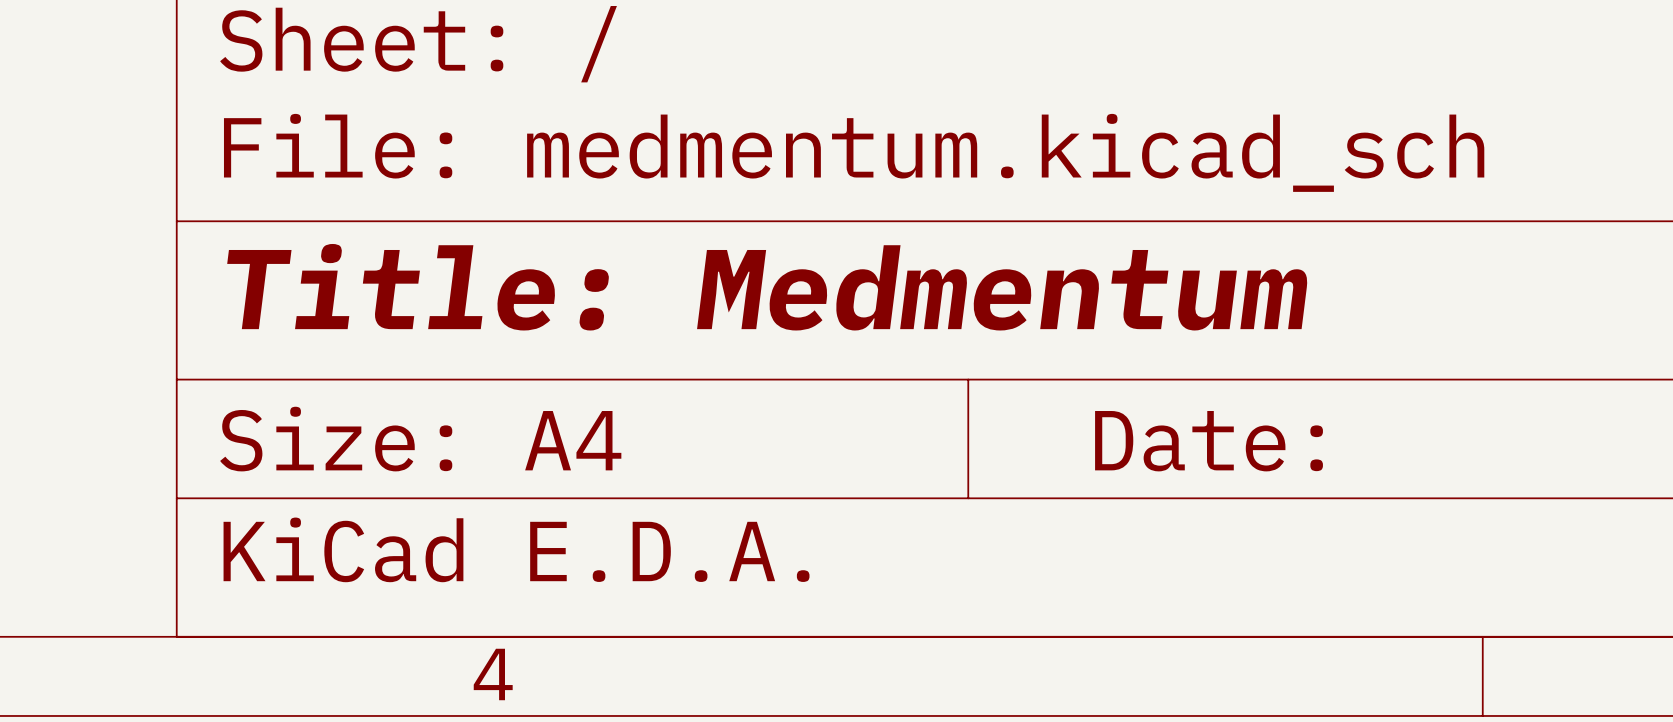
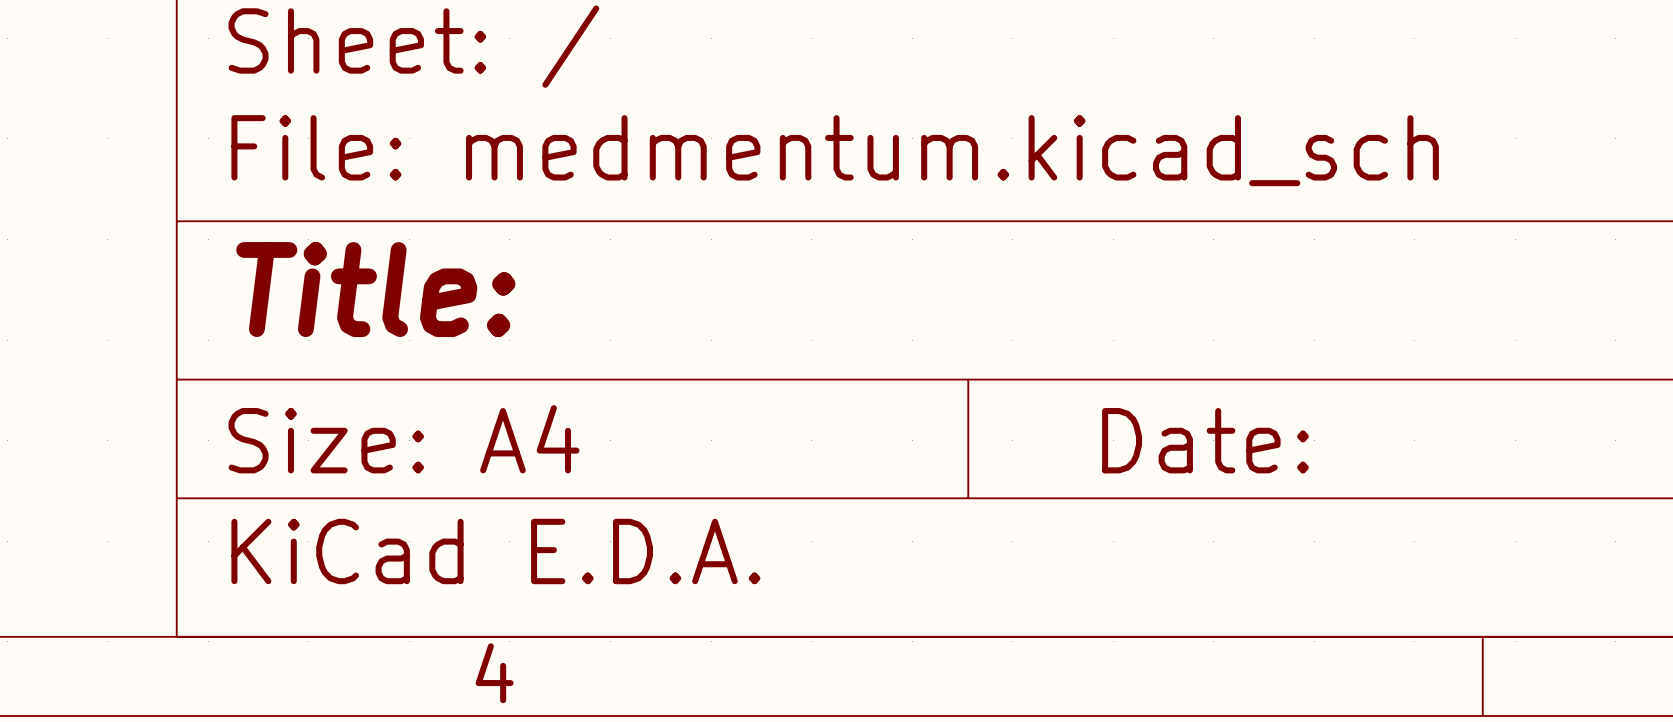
title block: Title: Medmentum (768, 287) -> Title: (375, 289)

